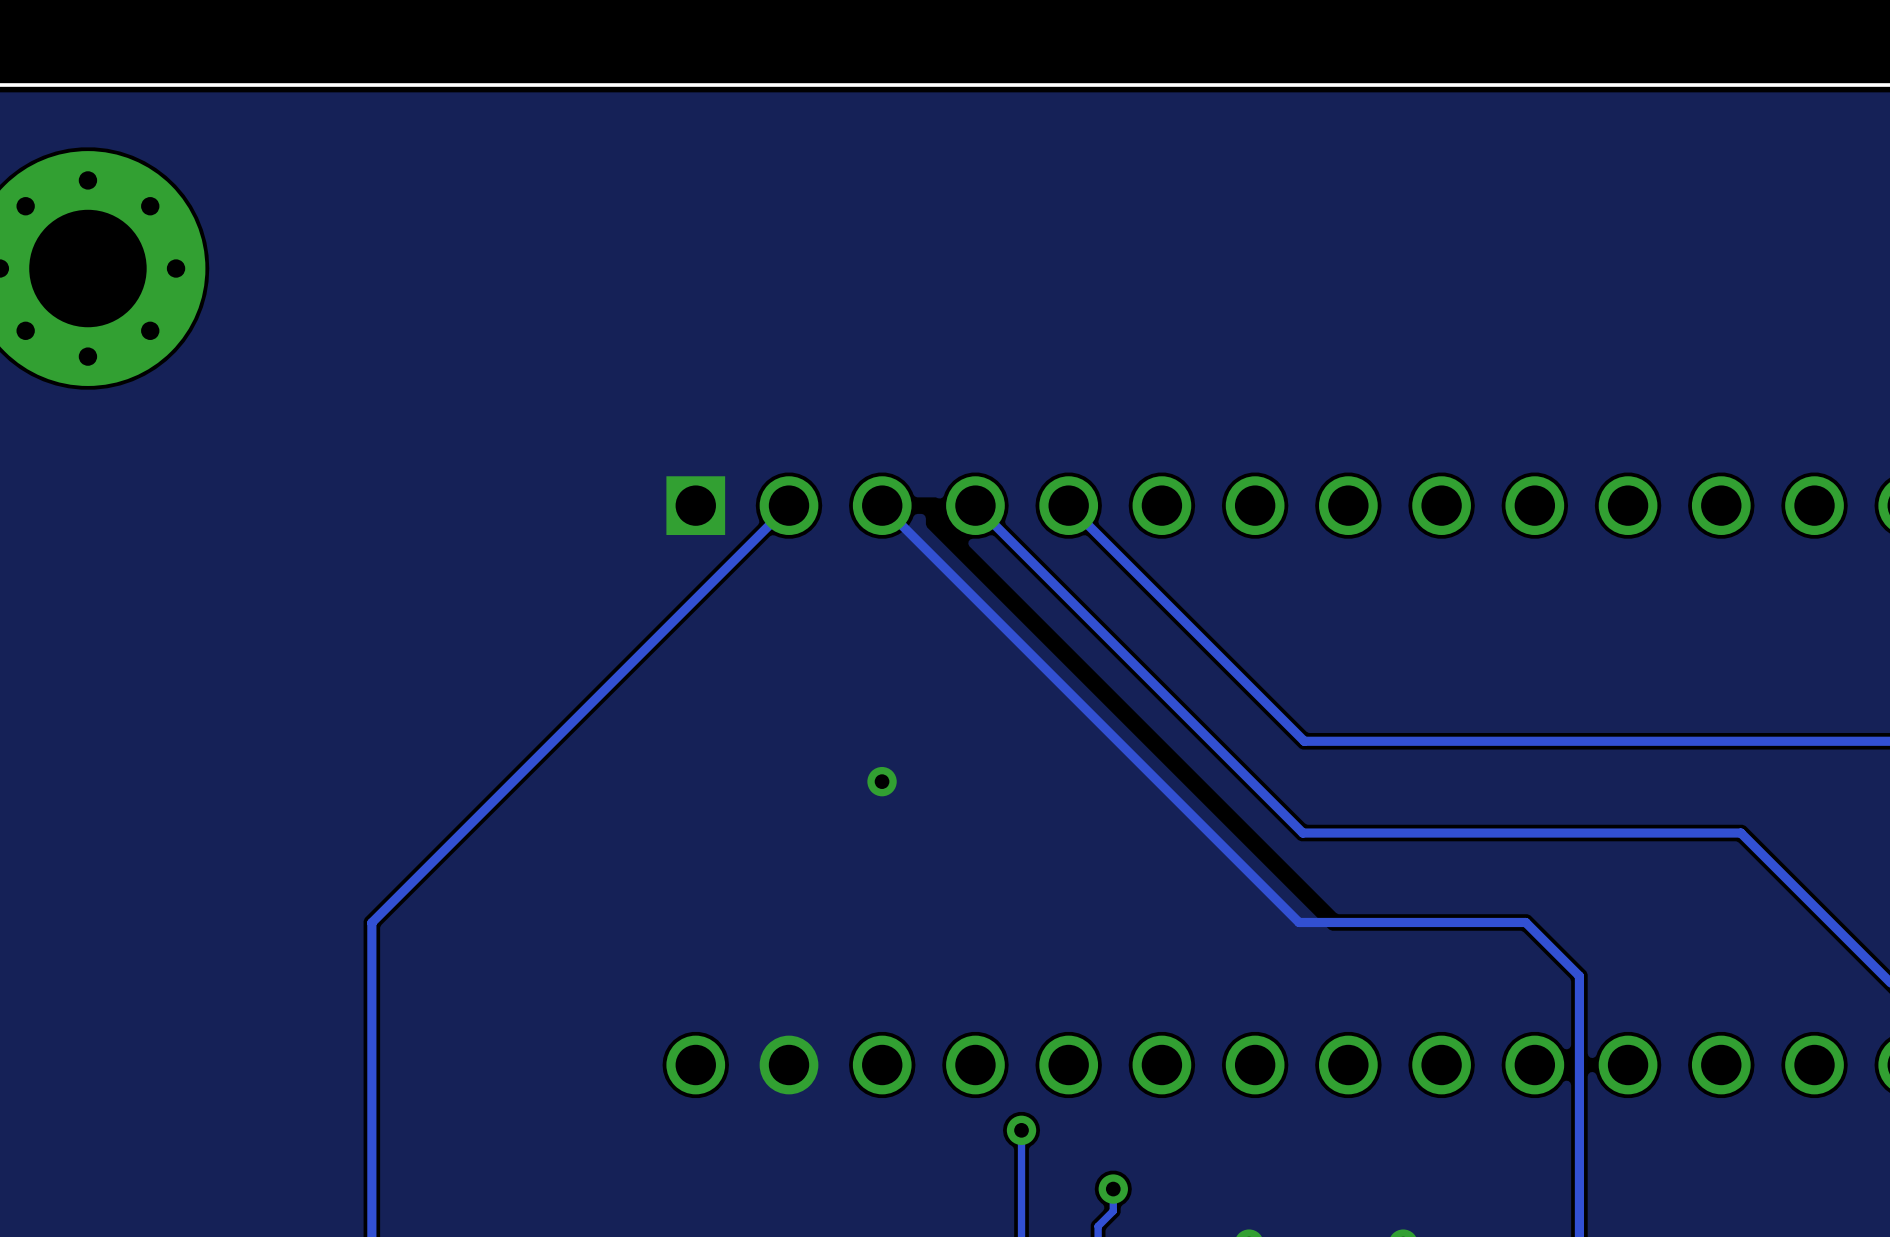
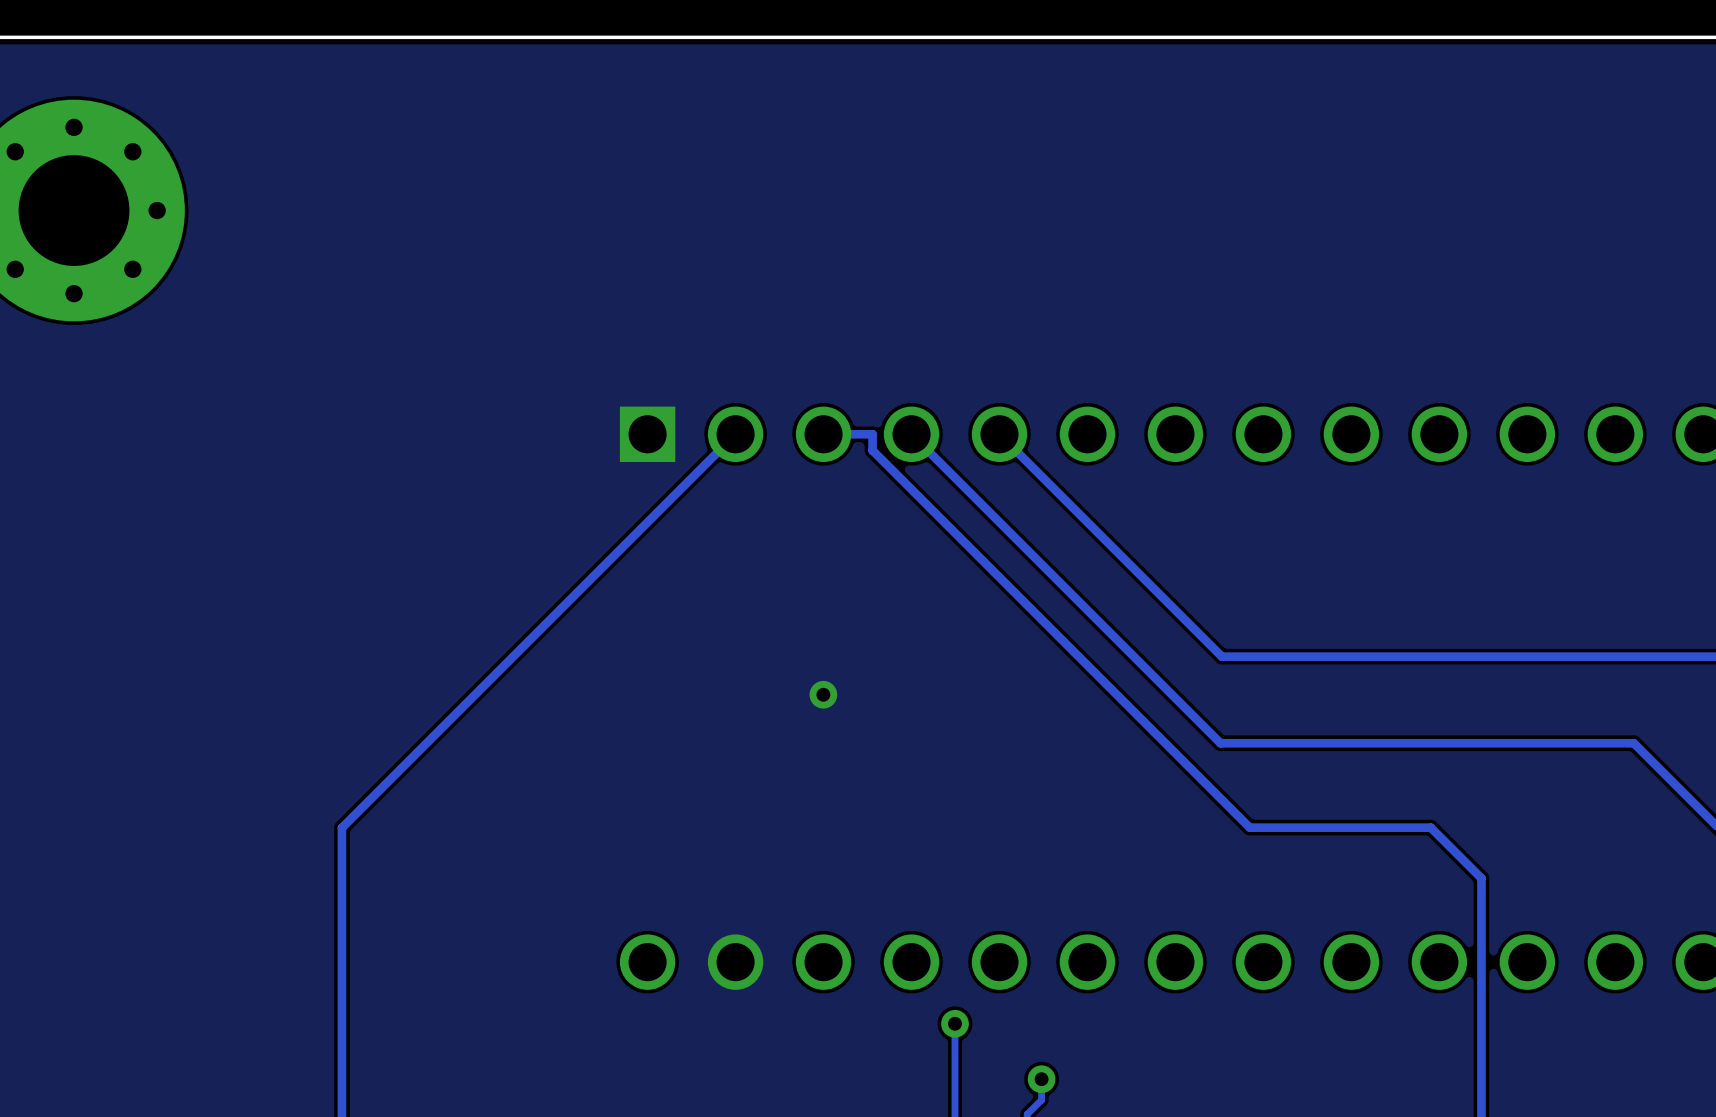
track: (882, 505) (1299, 922) (1333, 922) -> (823, 434) (872, 434) (872, 450) (1249, 827)

